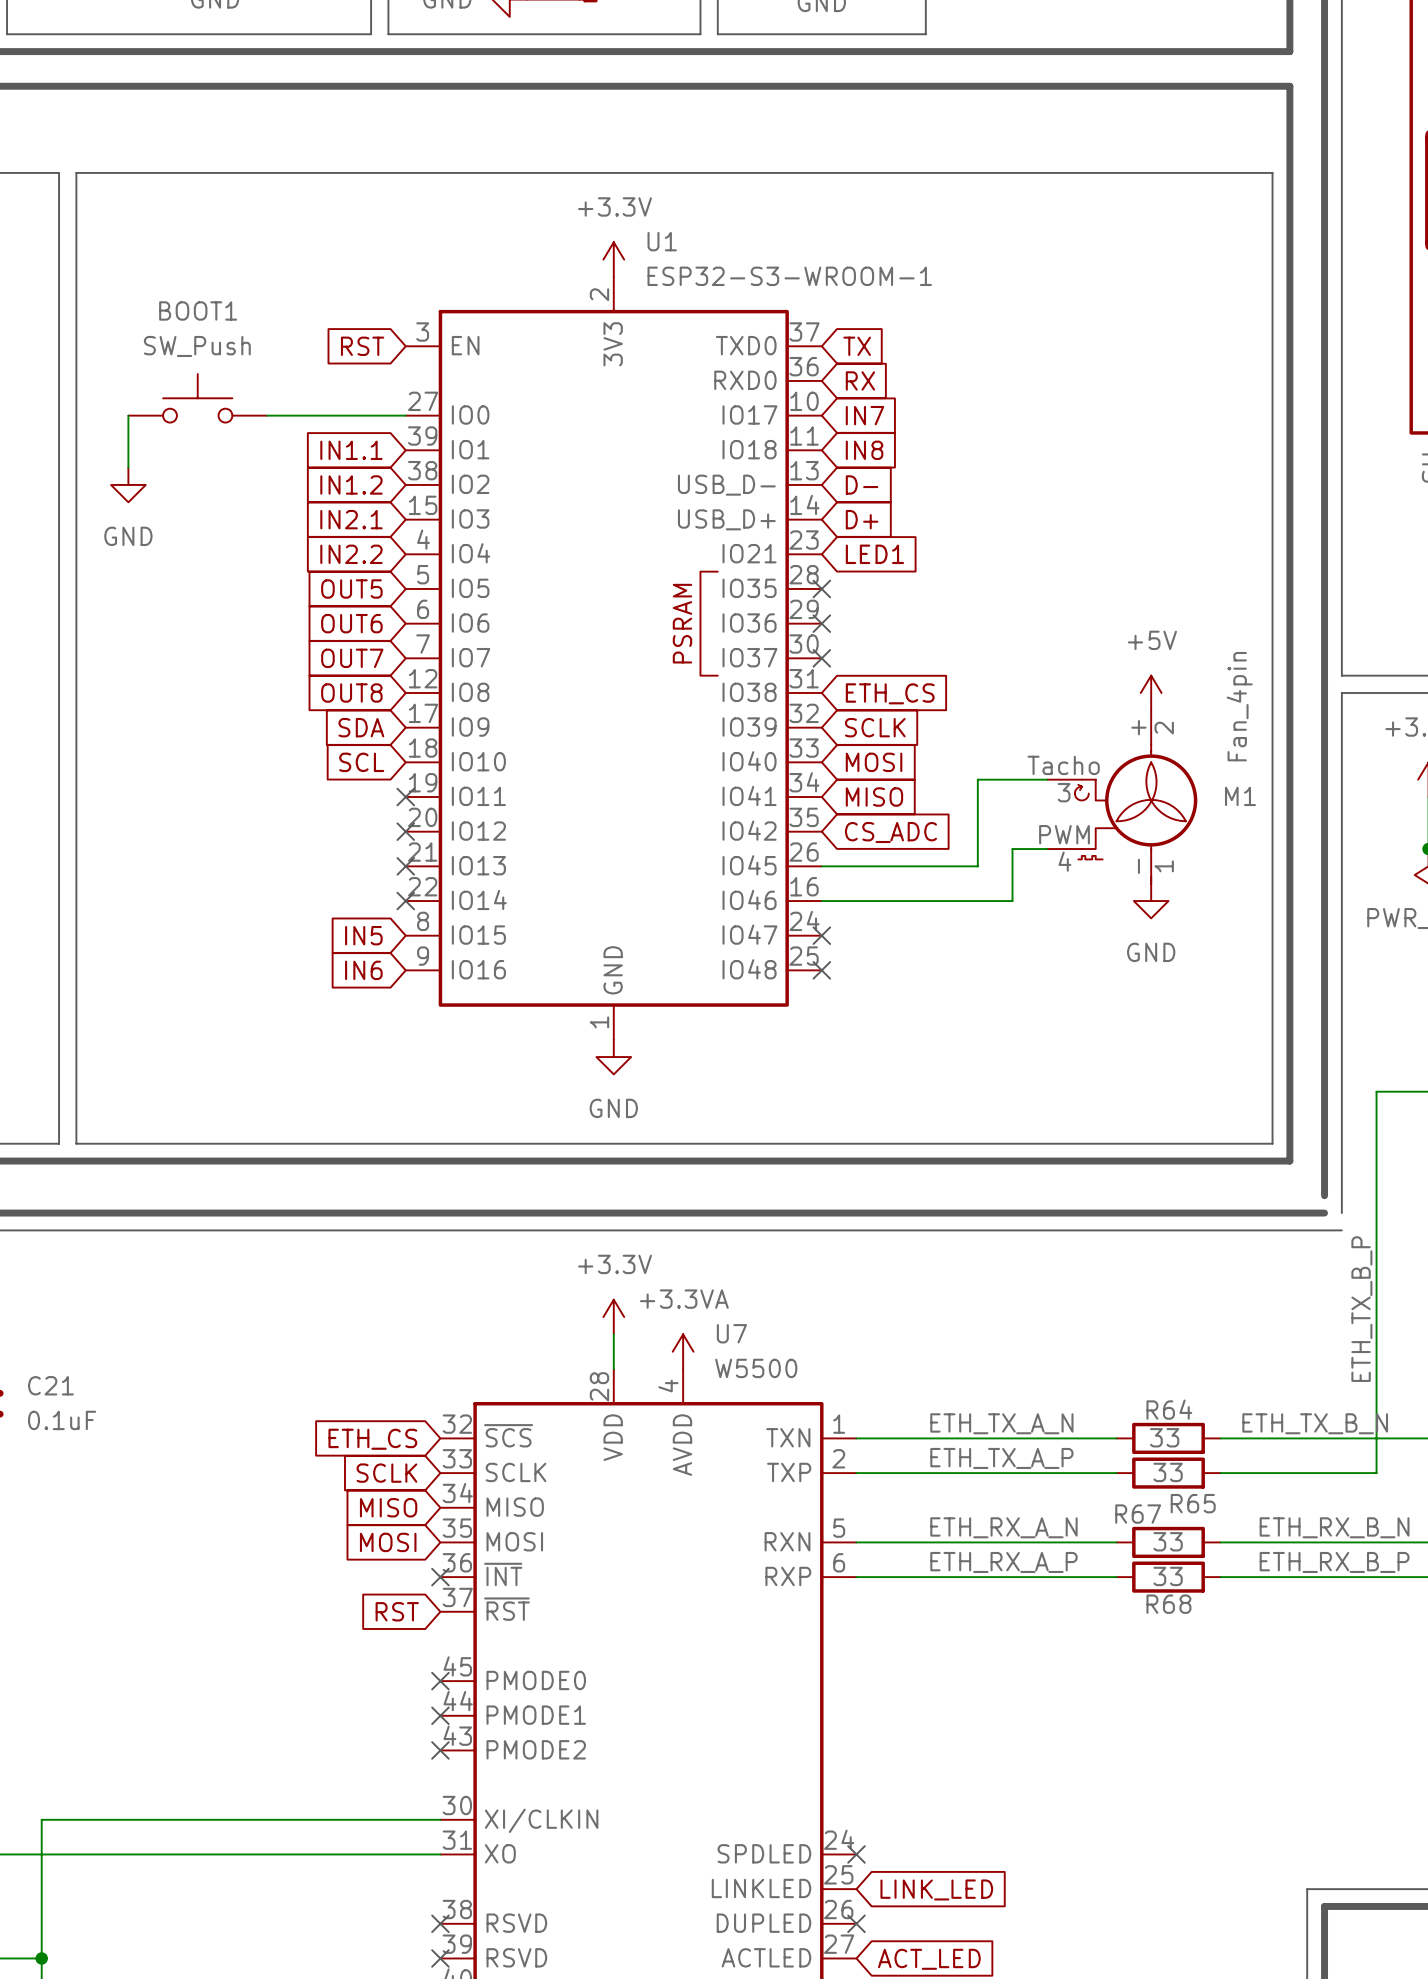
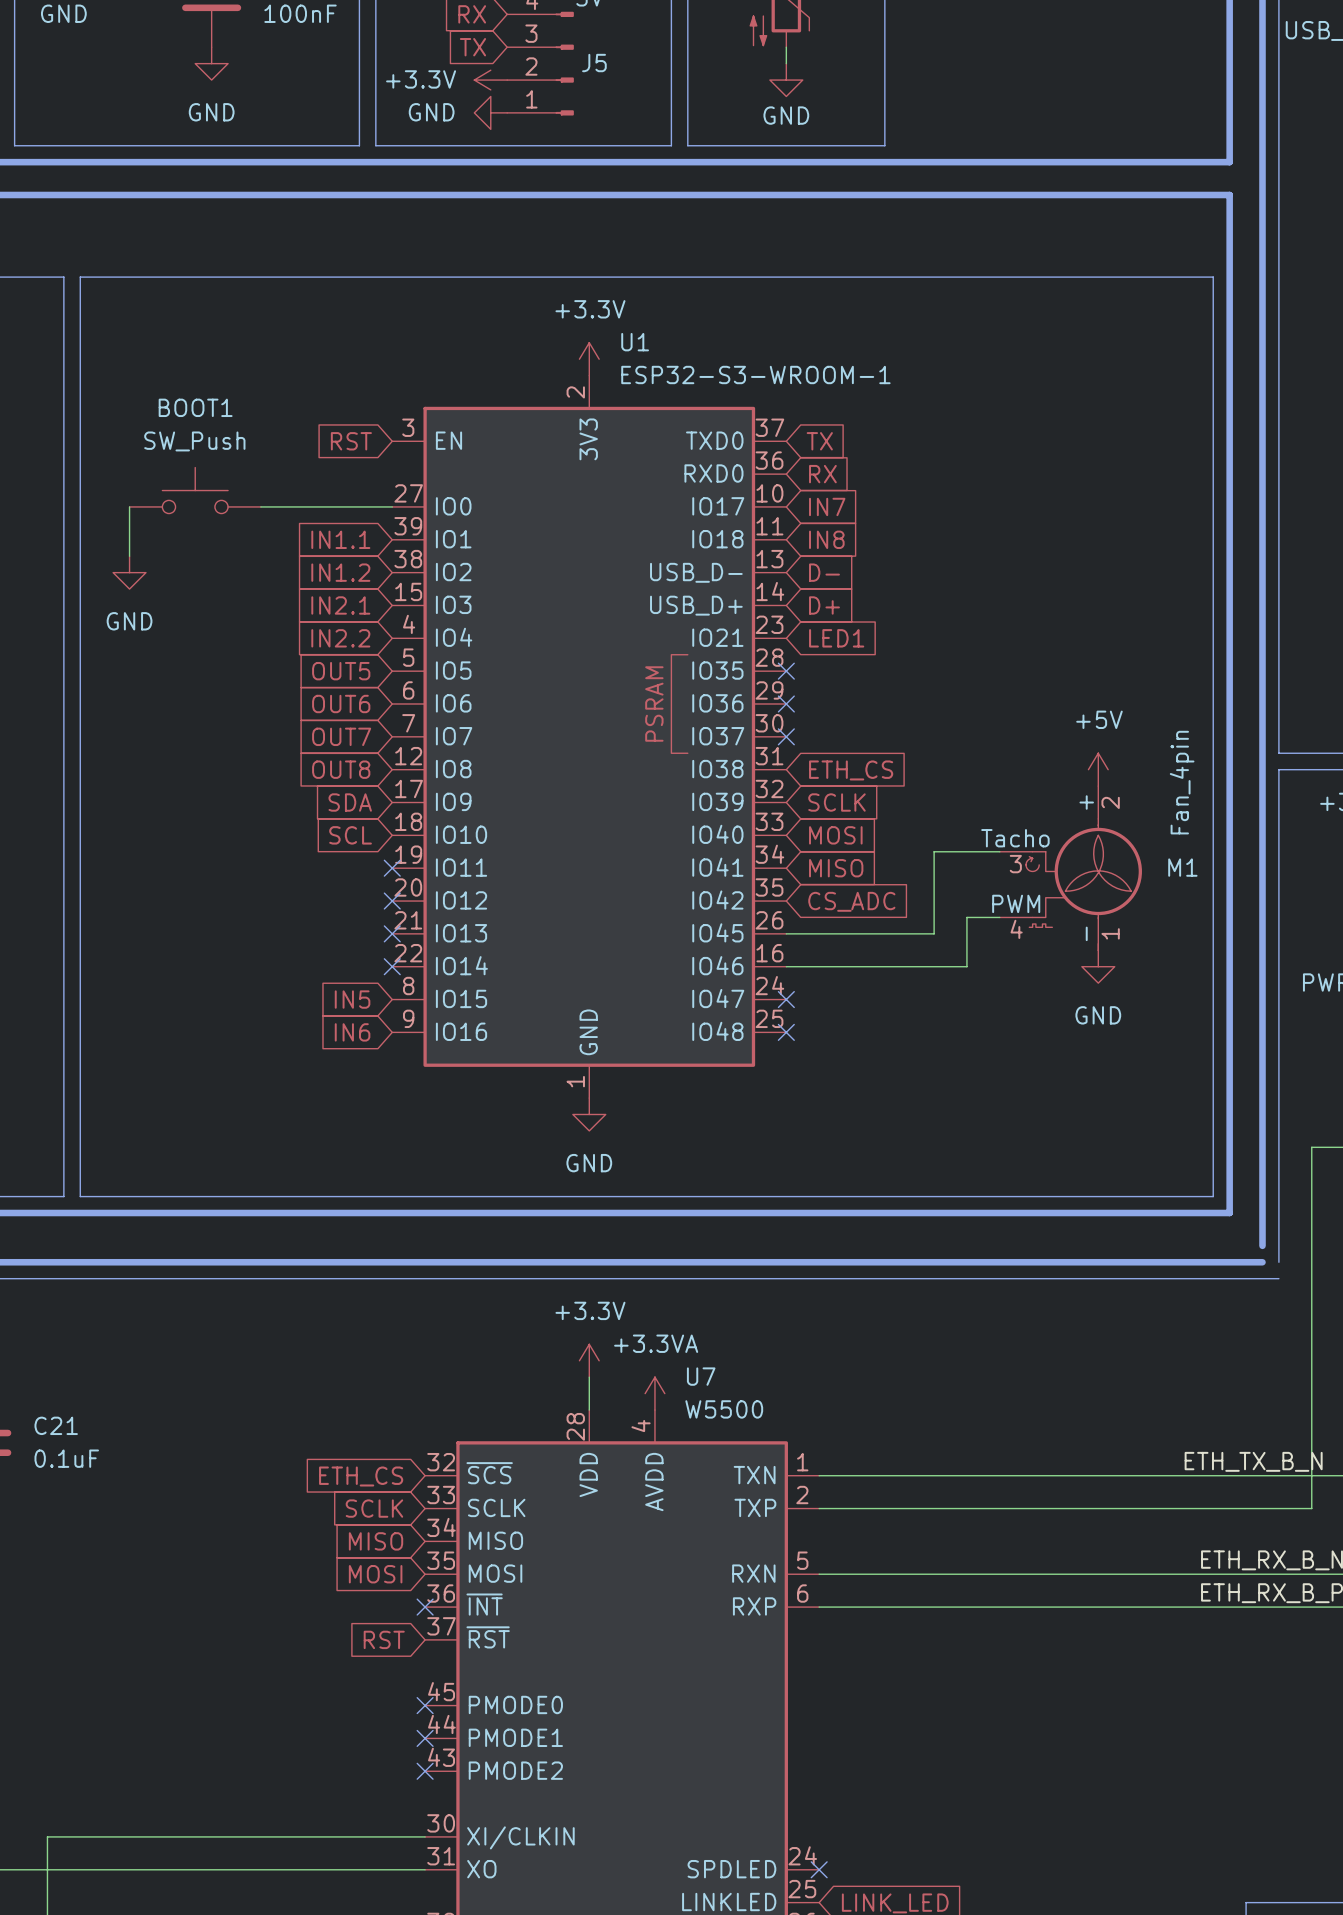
label: ETH_TX_B_P (1361, 1309) -> none
label: ETH_TX_A_N (1001, 1423) -> none
wire: none -> (1065, 1475) (1163, 1475)
R64: 33 (1168, 1438) -> none
label: ETH_TX_A_P (1001, 1458) -> none
wire: none -> (1065, 1508) (1163, 1508)
R65: 33 (1168, 1473) -> none
label: ETH_RX_A_N (1003, 1527) -> none
wire: none -> (1065, 1574) (1163, 1574)
R67: 33 (1168, 1542) -> none
label: ETH_RX_A_P (1003, 1562) -> none
wire: none -> (1065, 1607) (1163, 1607)
R68: 33 (1168, 1577) -> none

